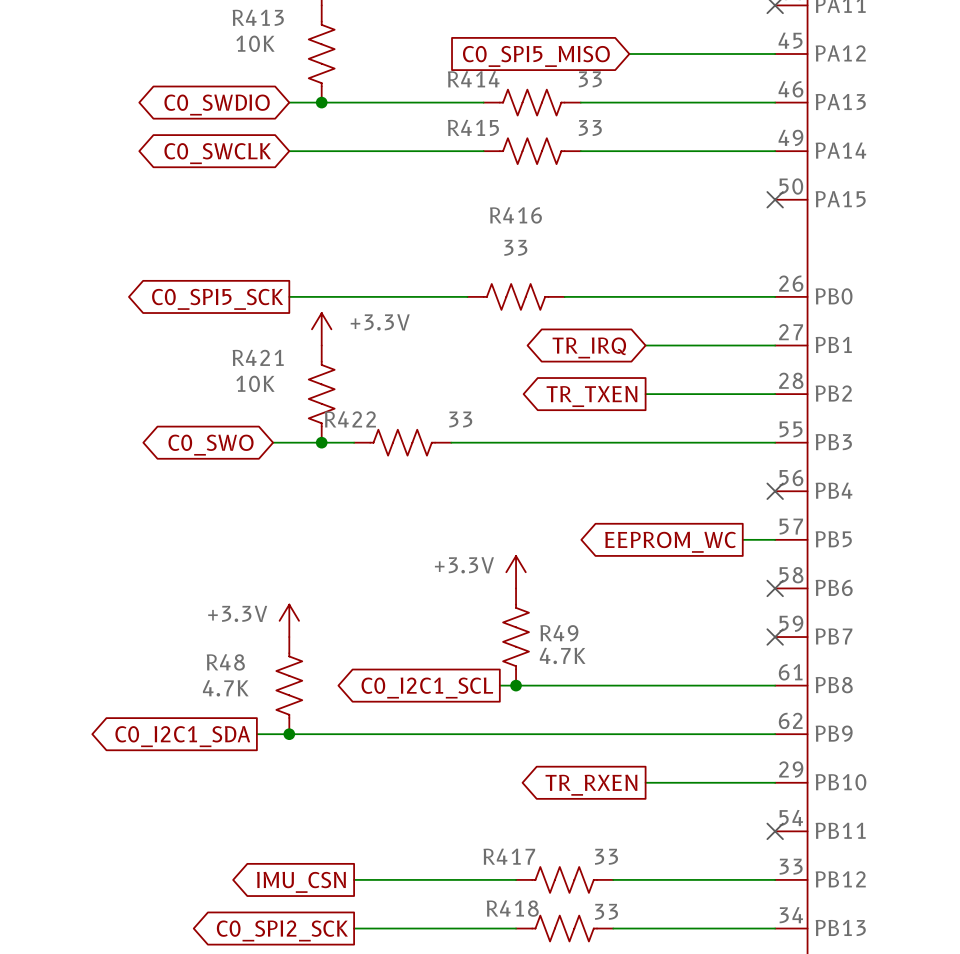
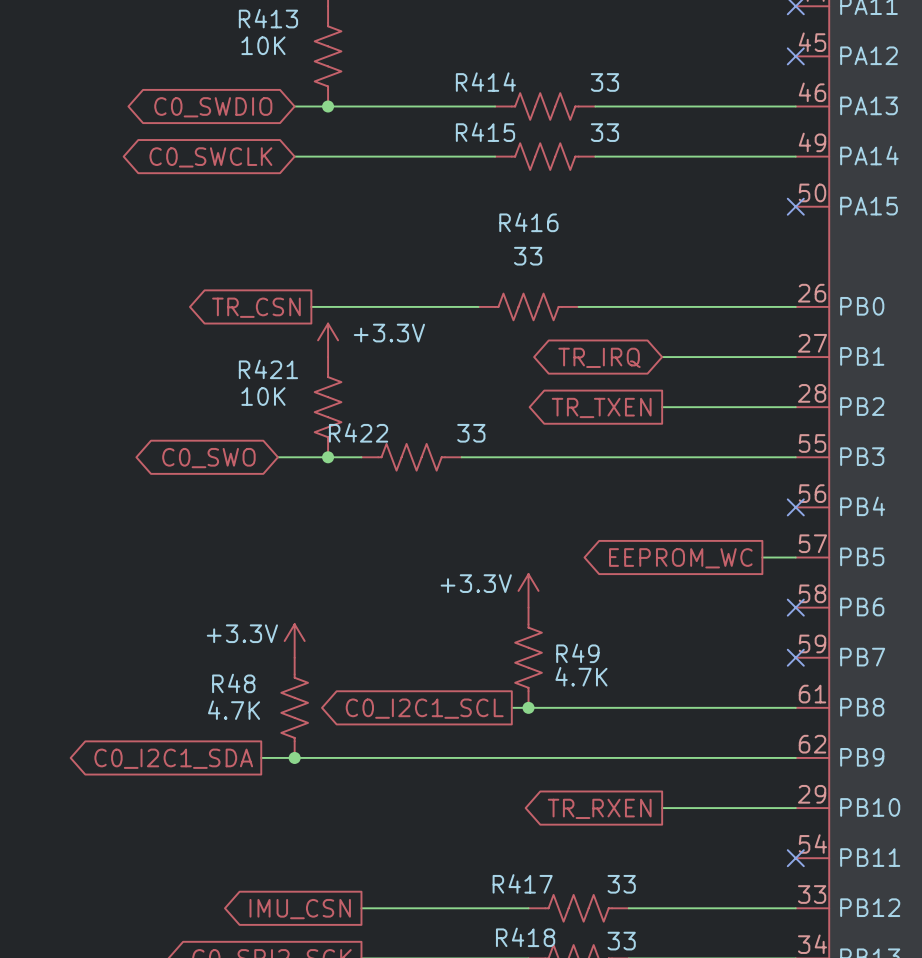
wire: (629, 54) (775, 54) -> none
no-connect mark: none -> (795, 56)
global label: C0_SPI5_MISO (536, 56) -> none
wire: (289, 296) (305, 296) -> none
global label: C0_SPI5_SCK (217, 299) -> none
global label: none -> TR_CSN (256, 307)

